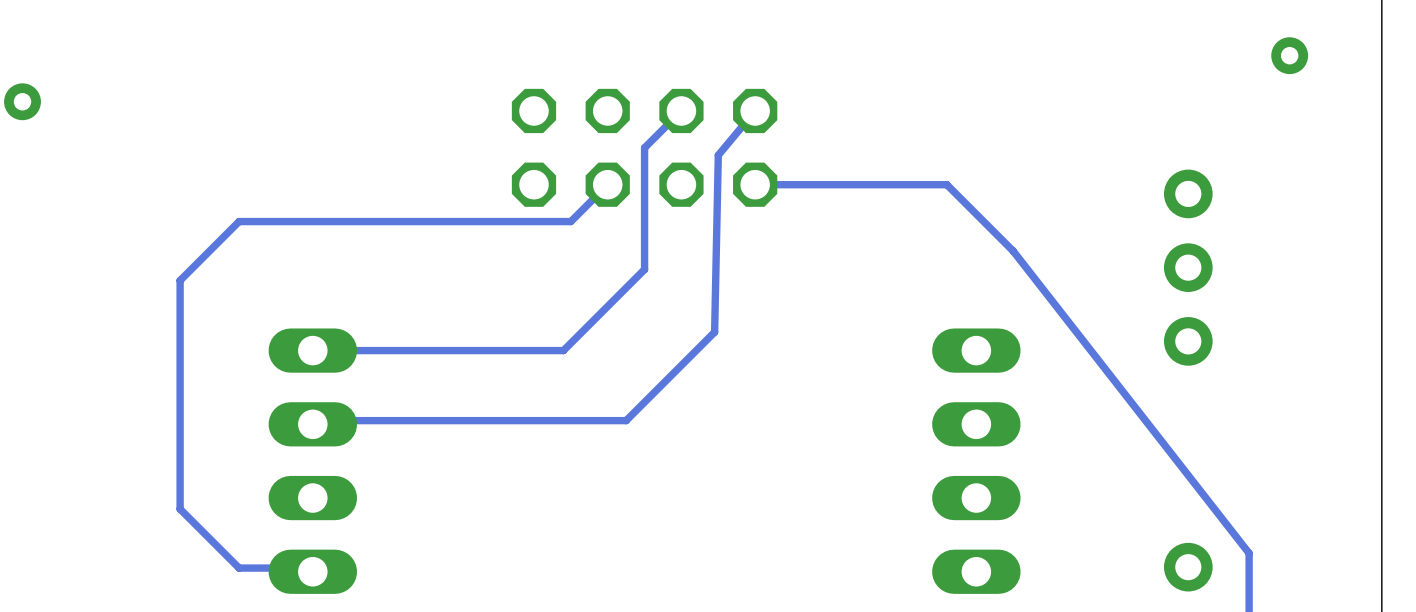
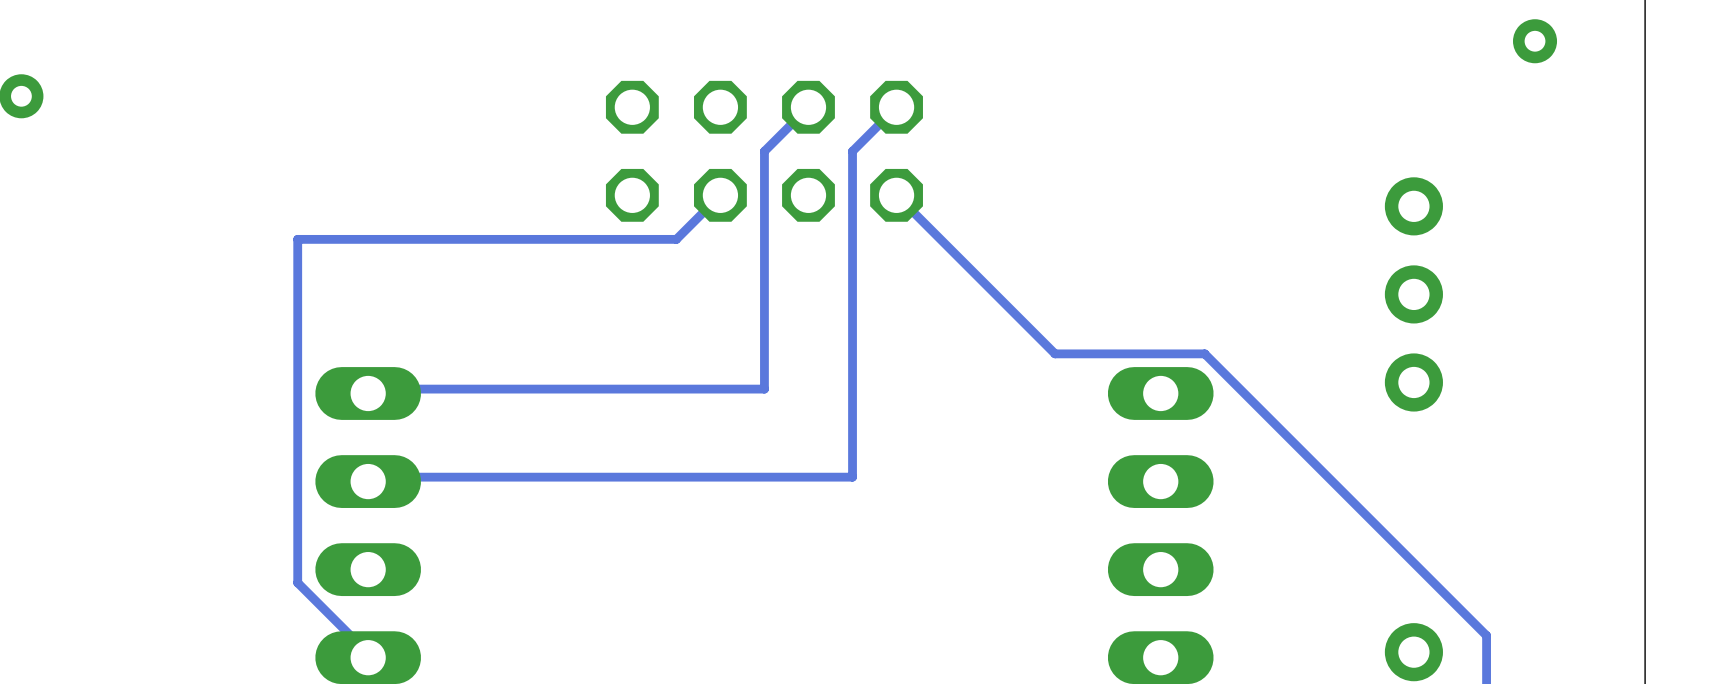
track: (755, 110) (718, 155) (714, 332) (626, 420) -> (896, 107) (852, 151) (852, 477) (742, 477)
track: (755, 184) (946, 184) (1013, 251) (1249, 553) -> (896, 195) (1055, 353) (1204, 353) (1486, 635)
track: (253, 221) (239, 221) (180, 280) (180, 509) (239, 568) (312, 568) -> (297, 239) (297, 582) (368, 653) (368, 657)
track: (644, 269) (563, 350) (312, 350) -> (764, 296) (764, 389) (368, 389)

